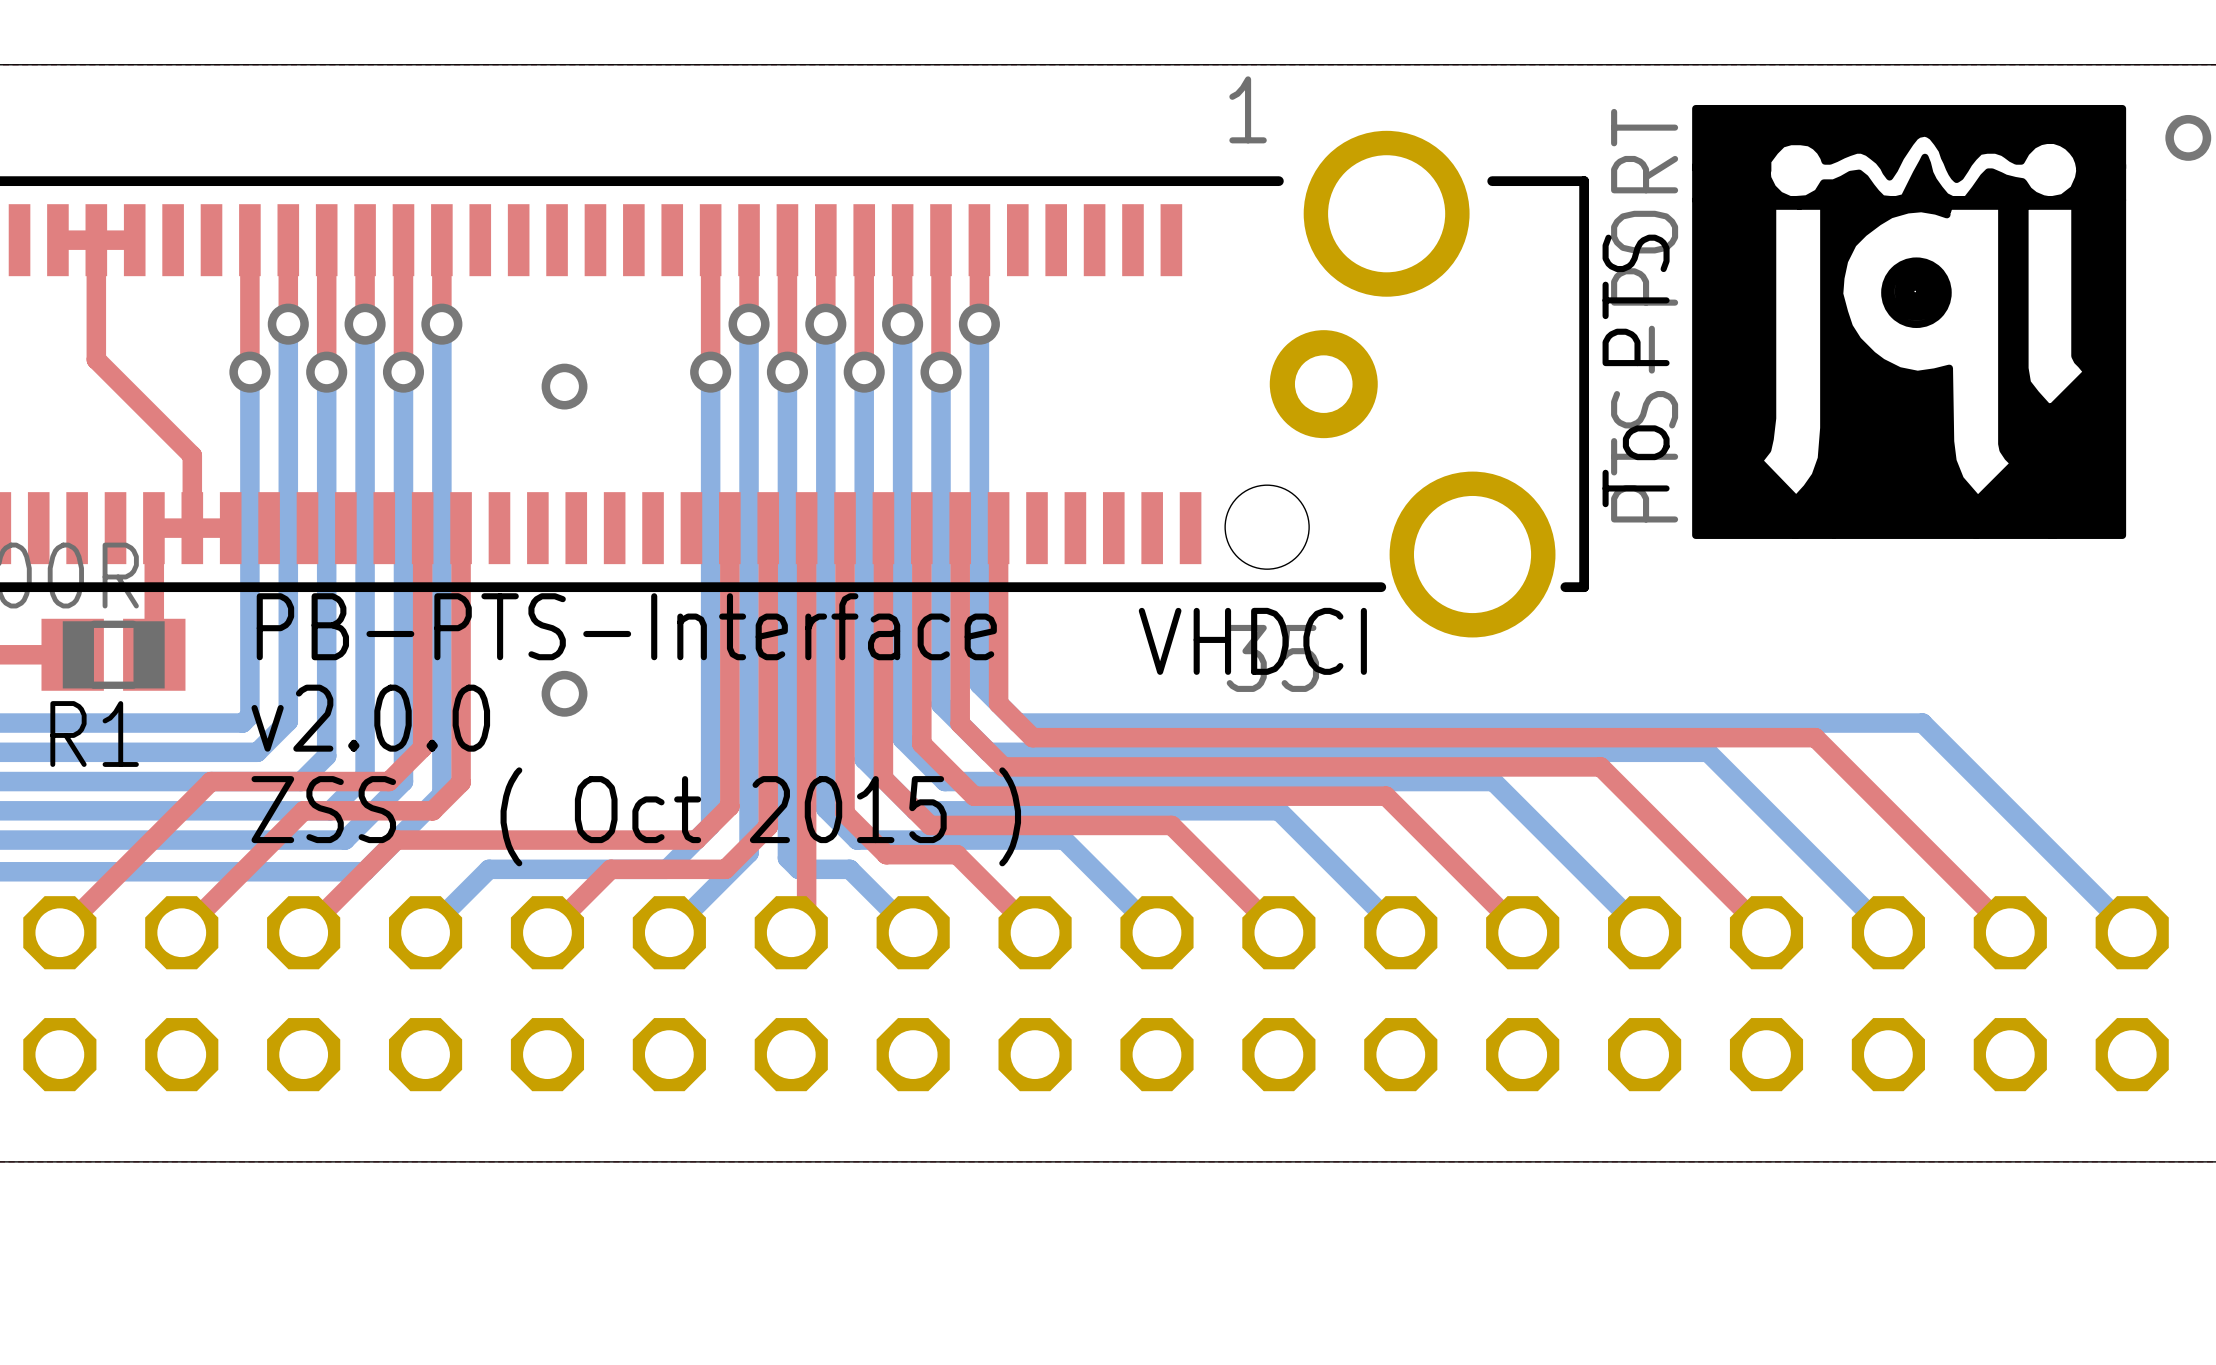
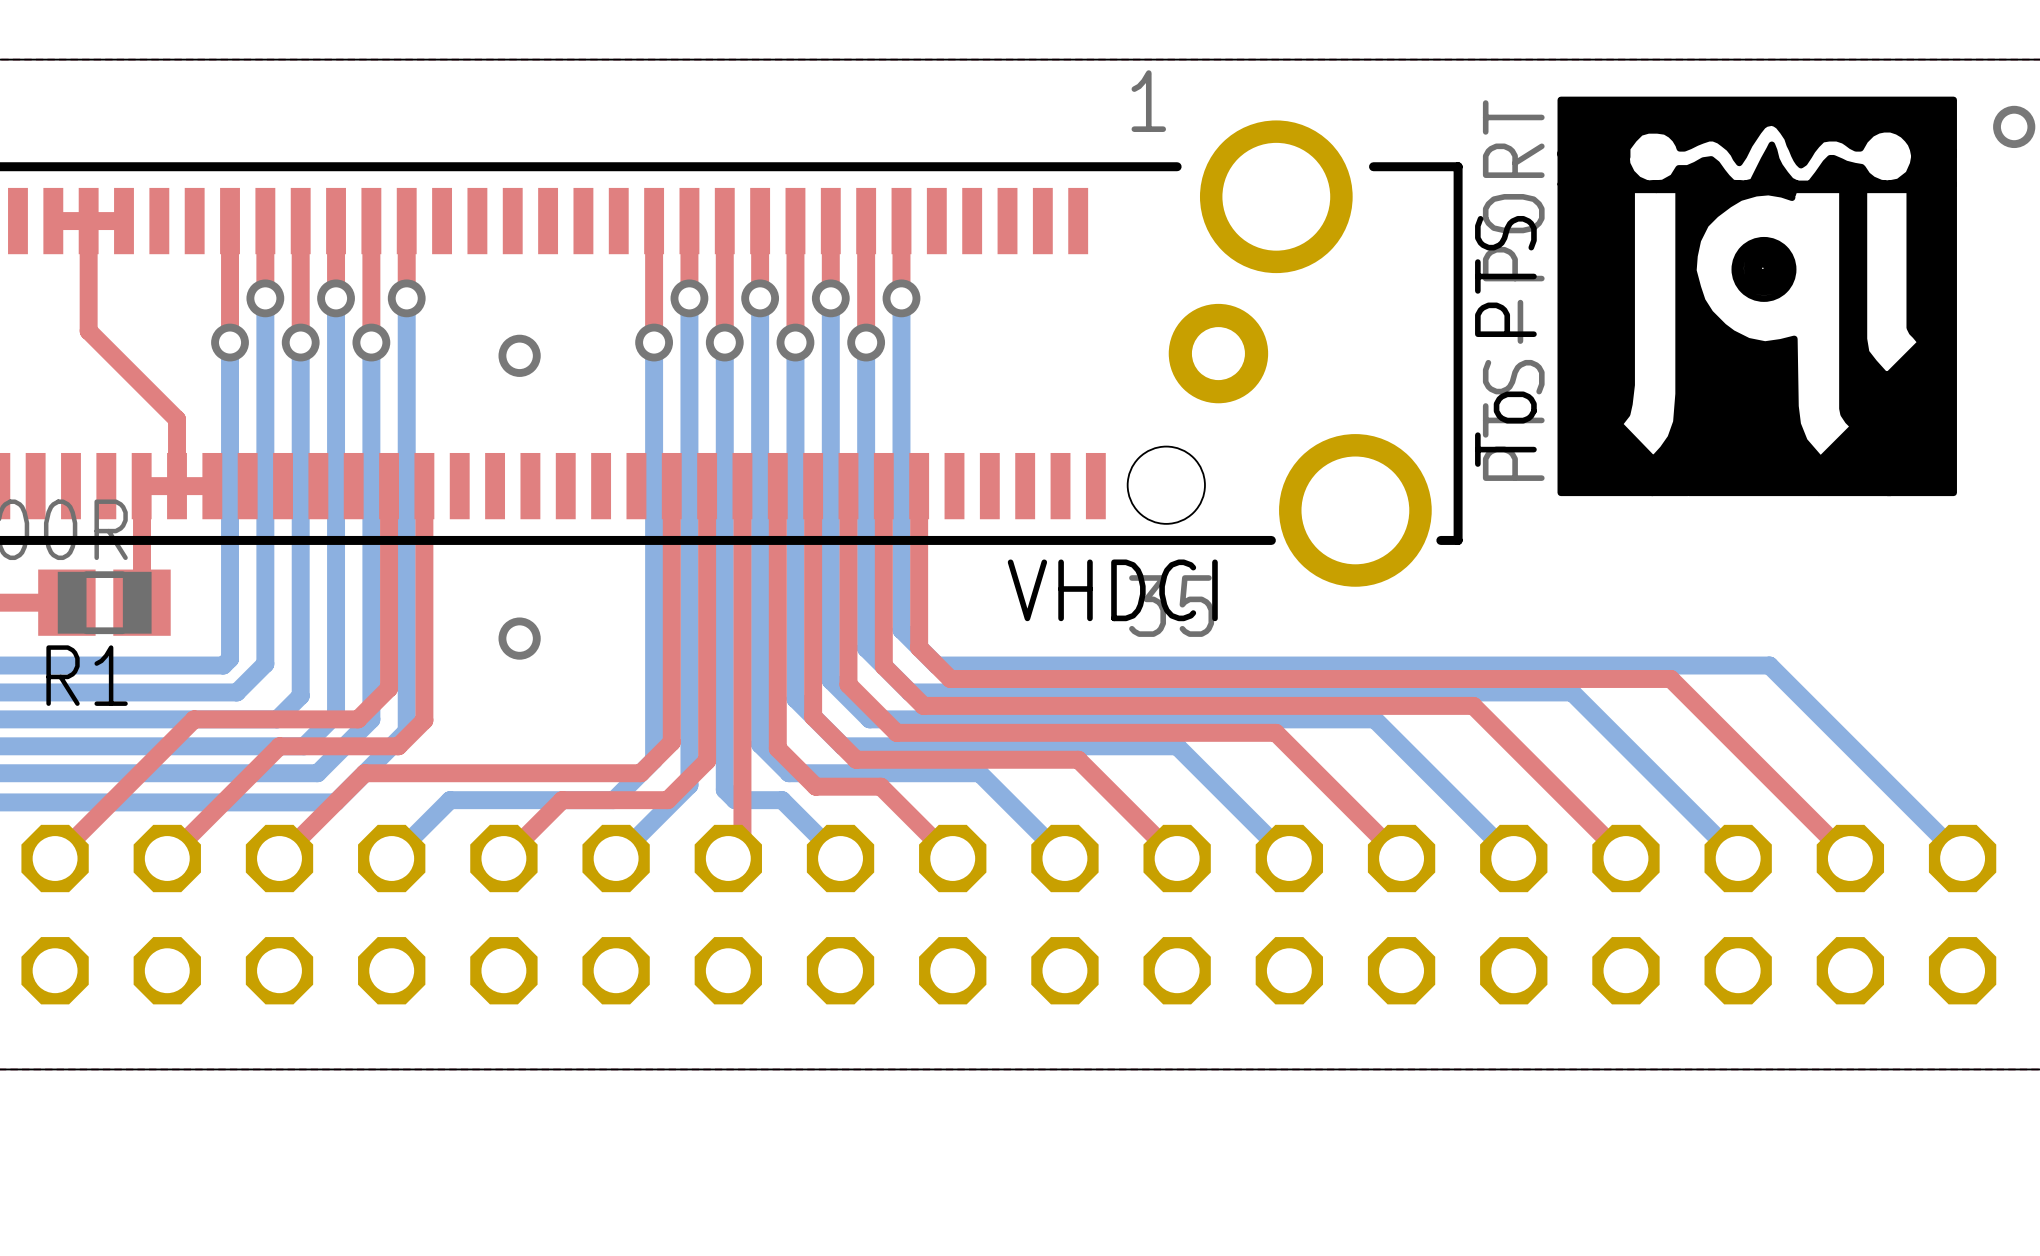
drawing: [251, 593, 1022, 867] -> none
text position: VHDCI (1252, 641) -> VHDCI (1112, 590)

